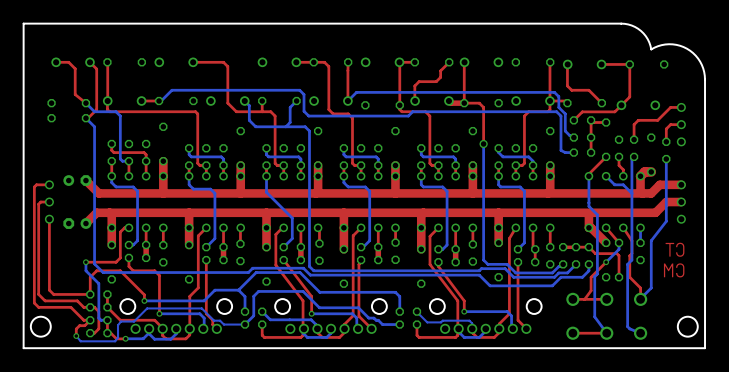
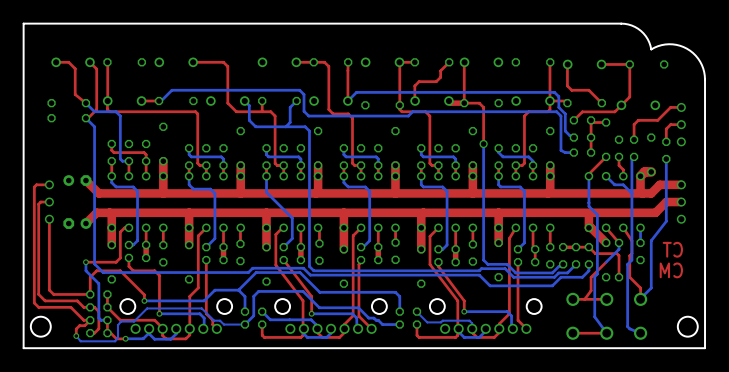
via: (606, 262) -> none

